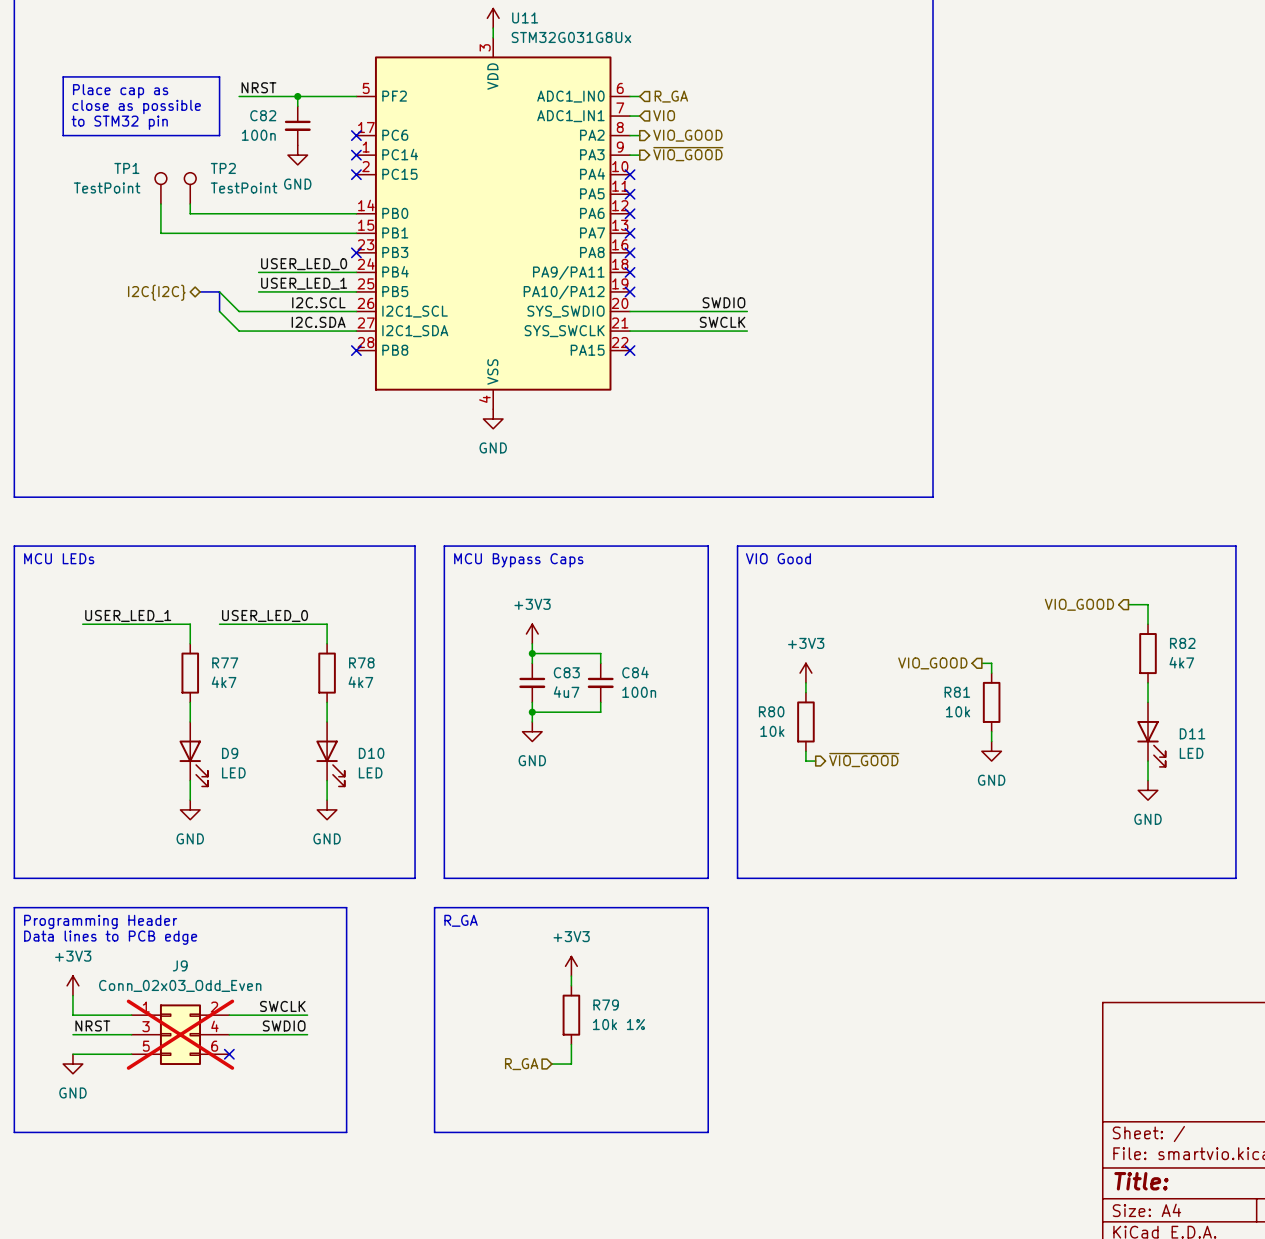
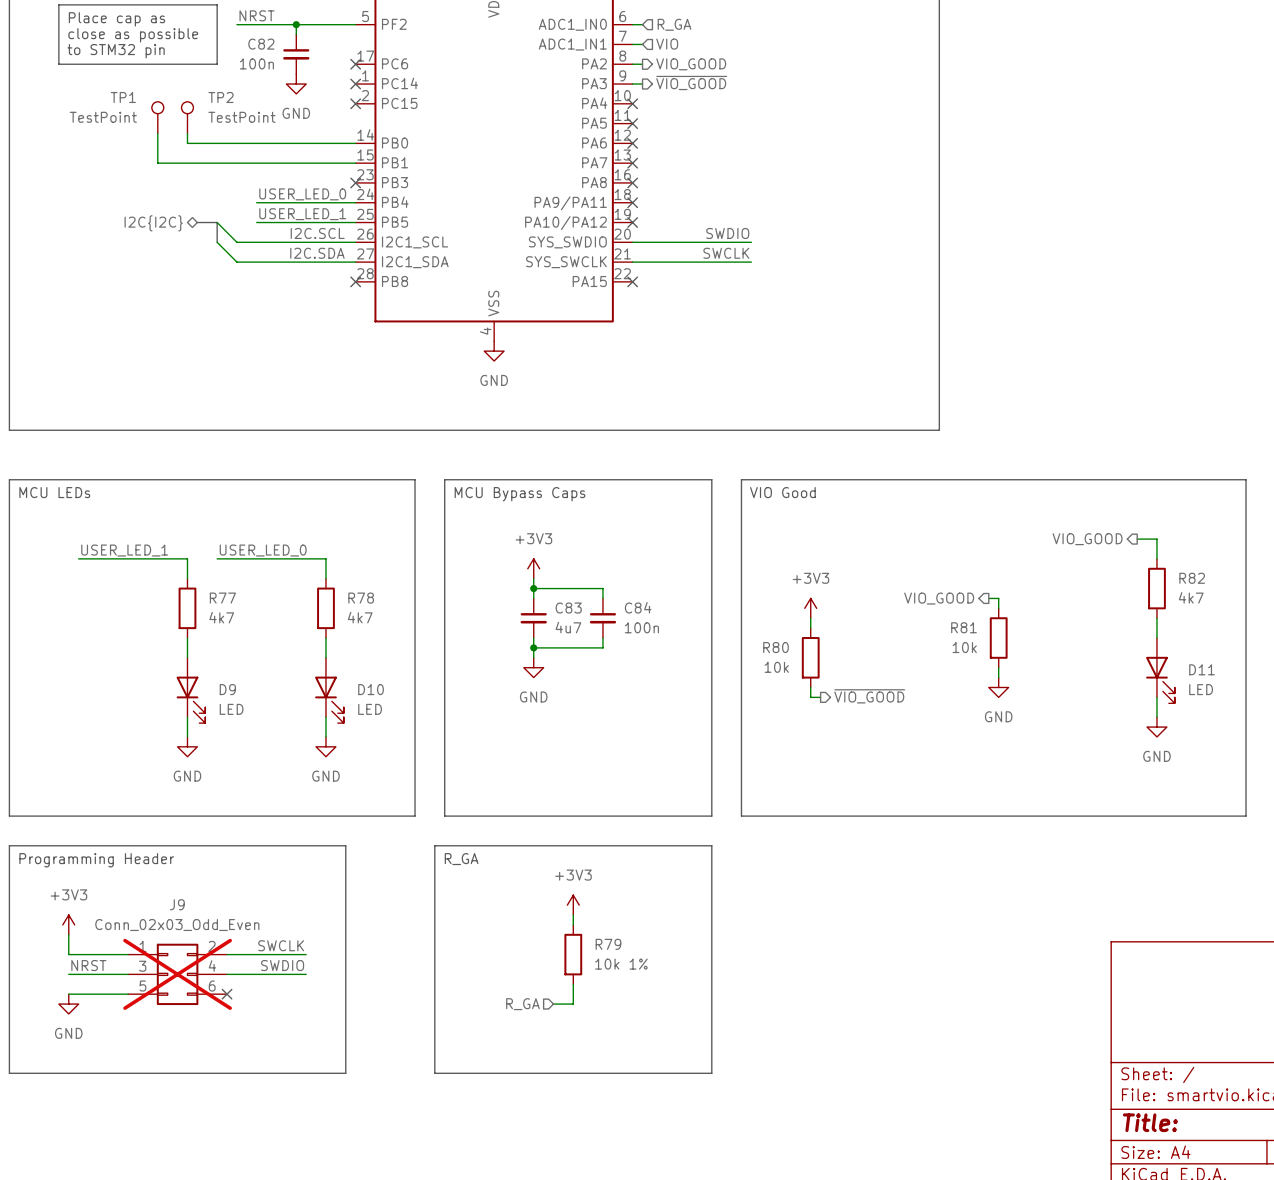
text: Data lines to PCB edge (110, 937) -> none

